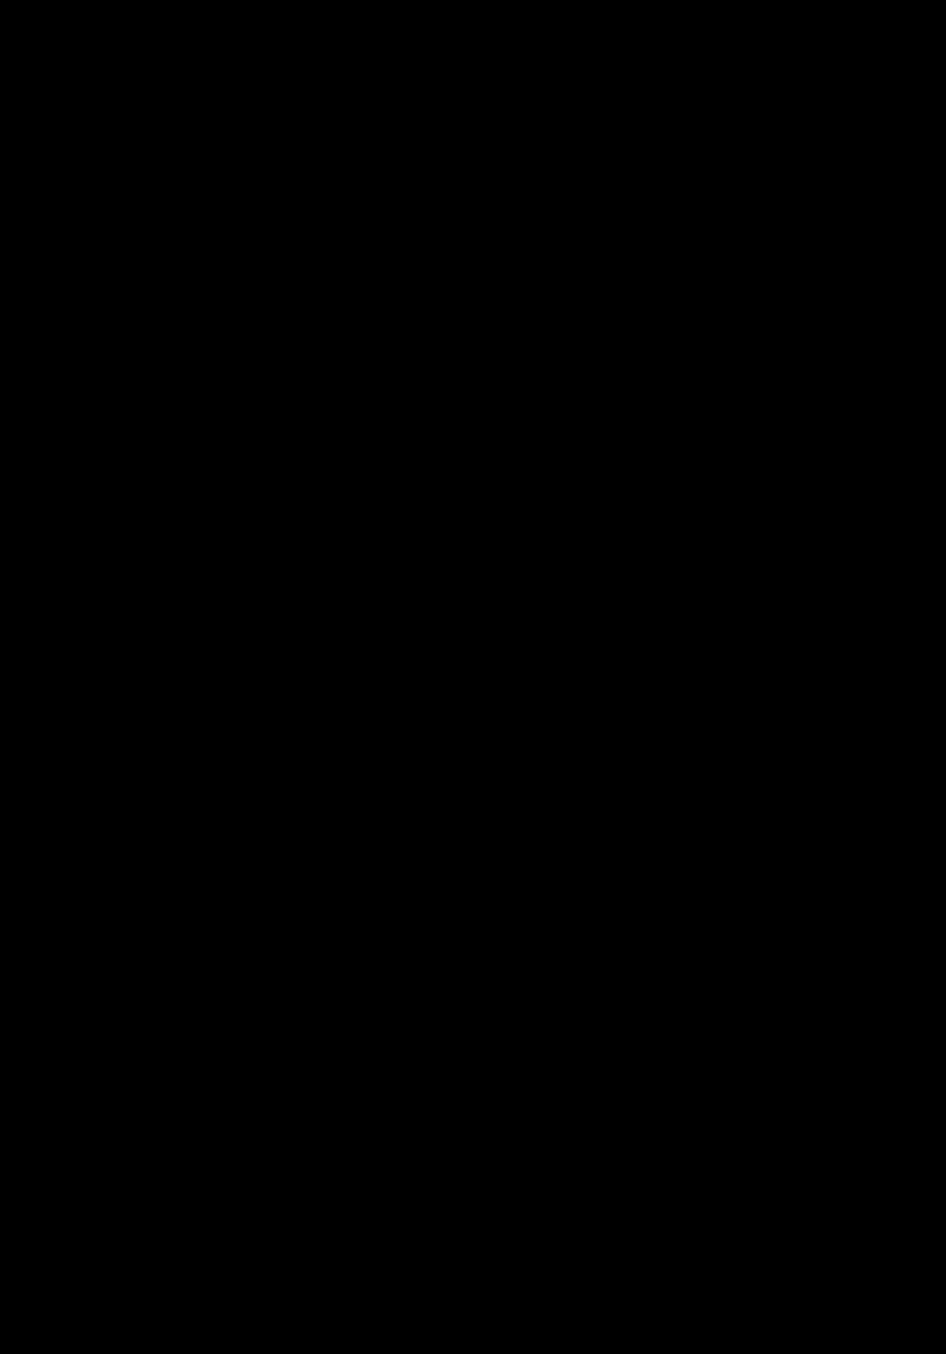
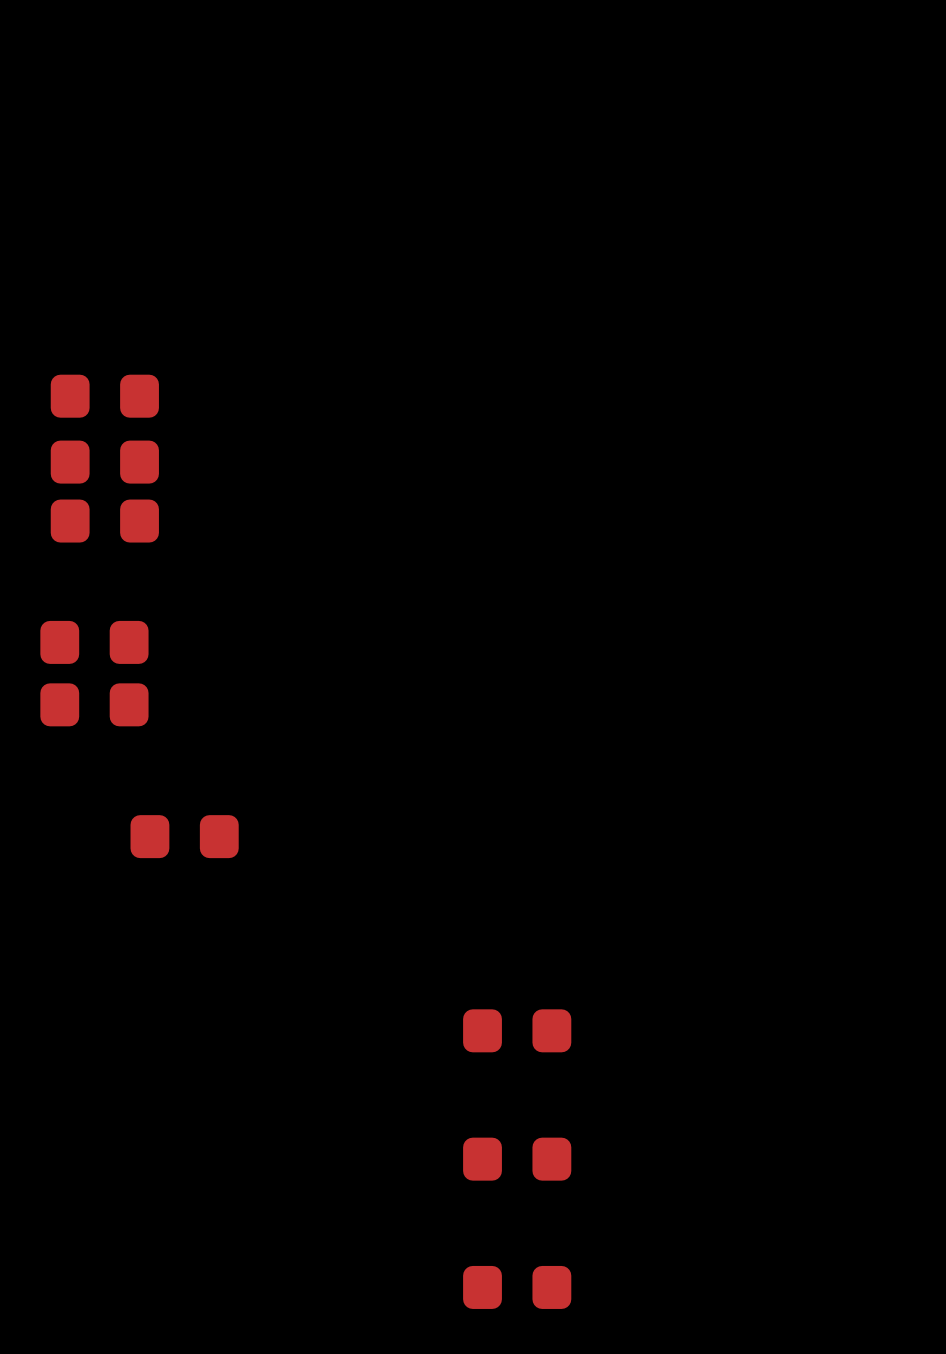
part: none -> (104, 396)
part: none -> (104, 462)
part: none -> (104, 521)
part: none -> (94, 642)
part: none -> (94, 704)
part: none -> (184, 836)
part: none -> (517, 1030)
part: none -> (517, 1159)
part: none -> (517, 1287)

